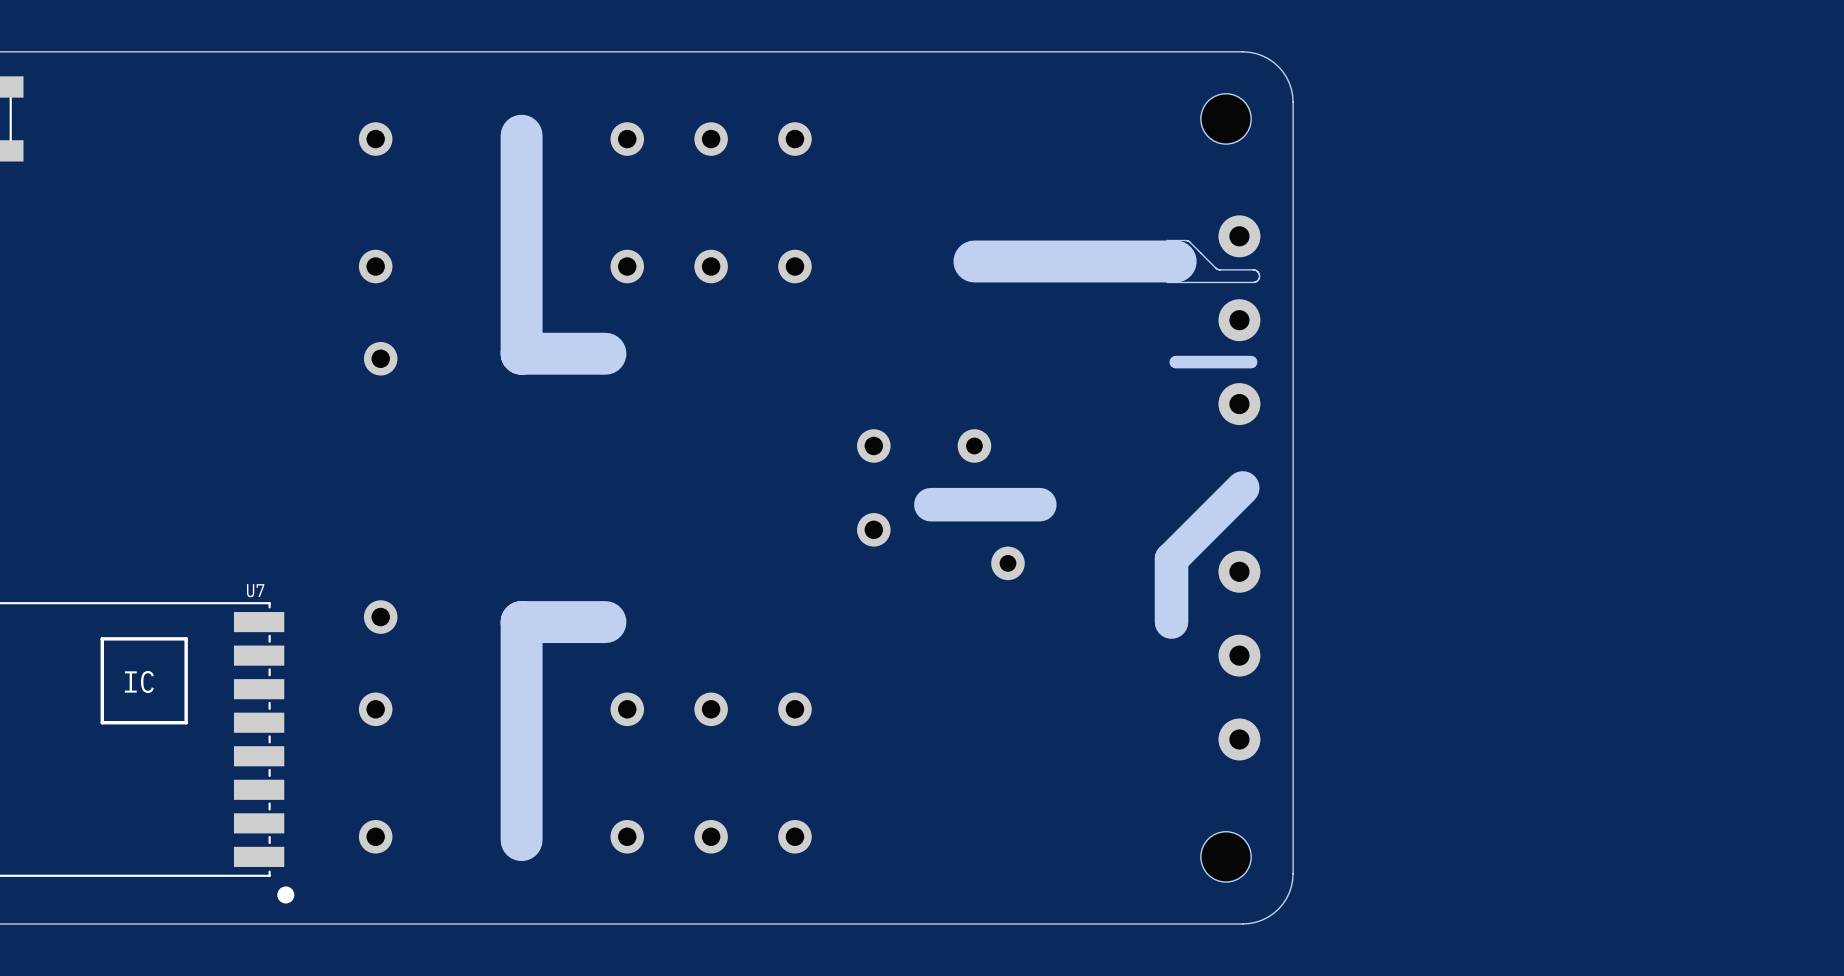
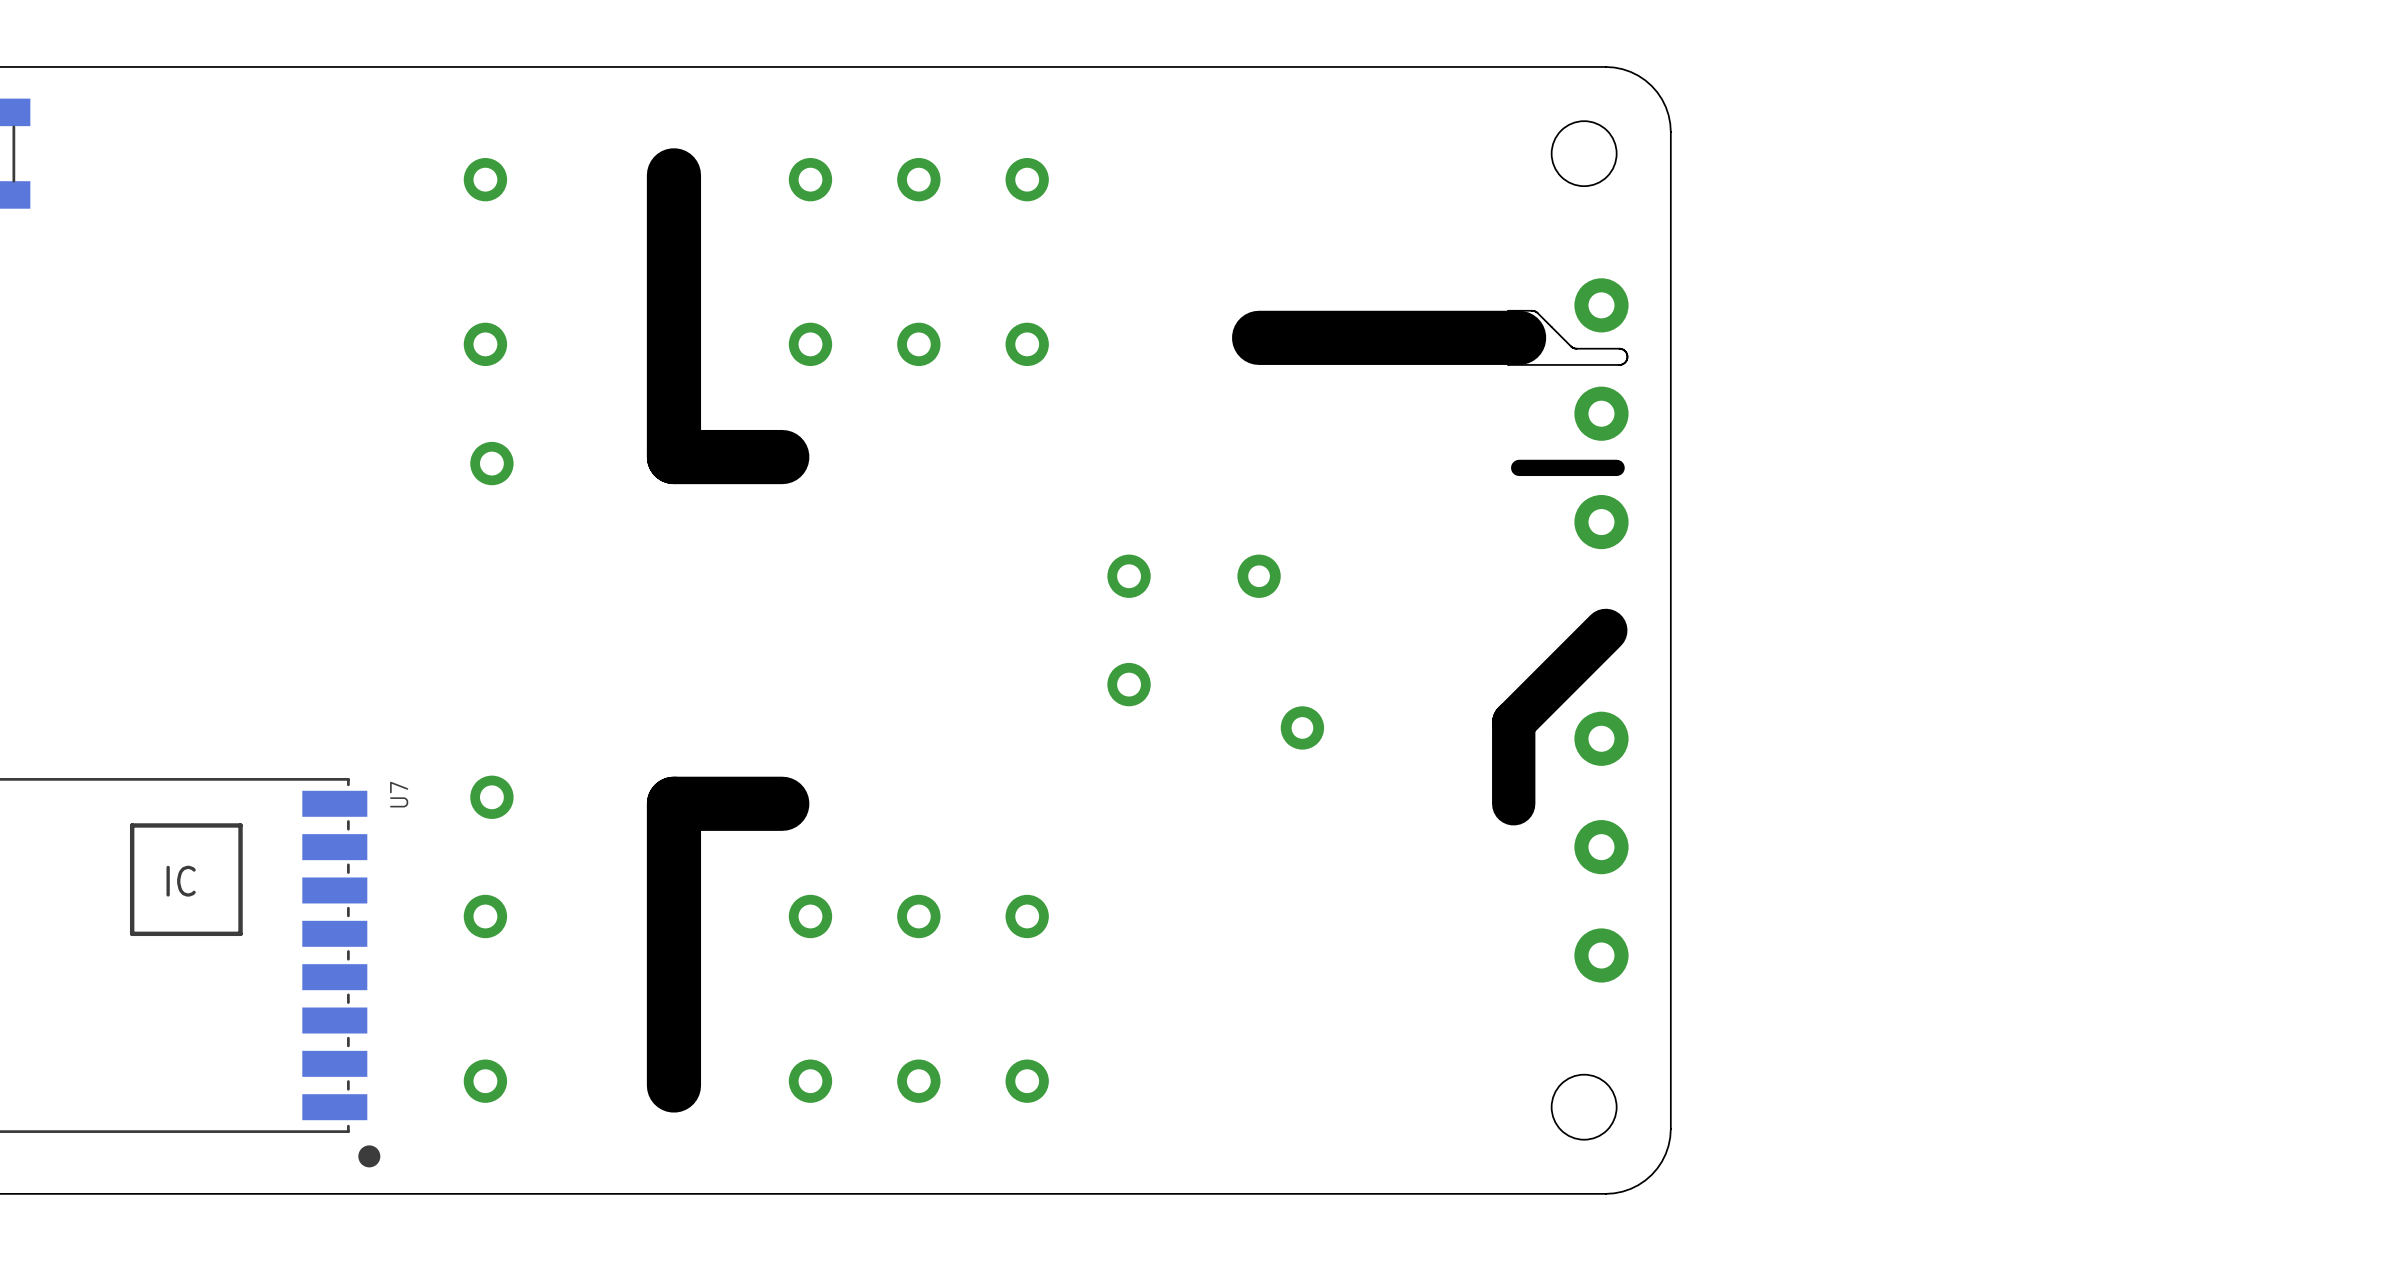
board edge: (1039, 504) (930, 504) -> none
U7 name rotation: 0° (255, 590) -> 90° counterclockwise (399, 794)
U7 name position: U7 (255, 590) -> U7 (399, 794)

